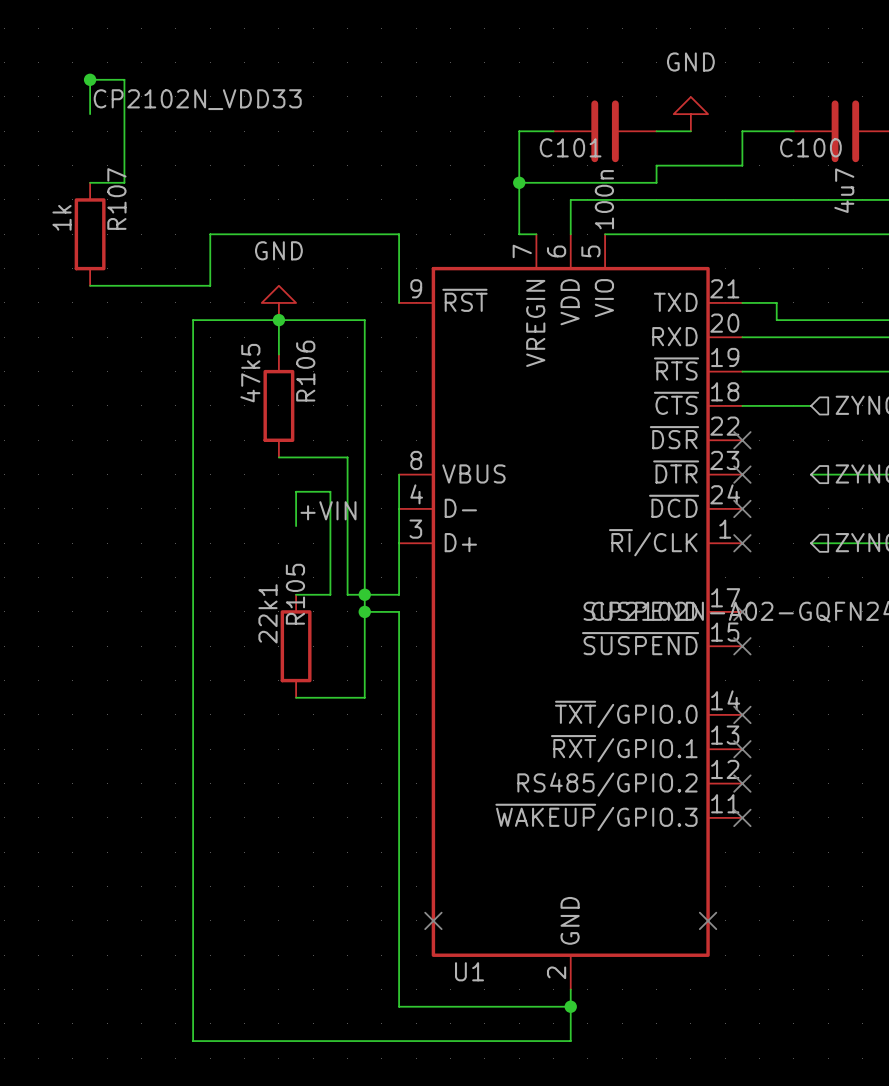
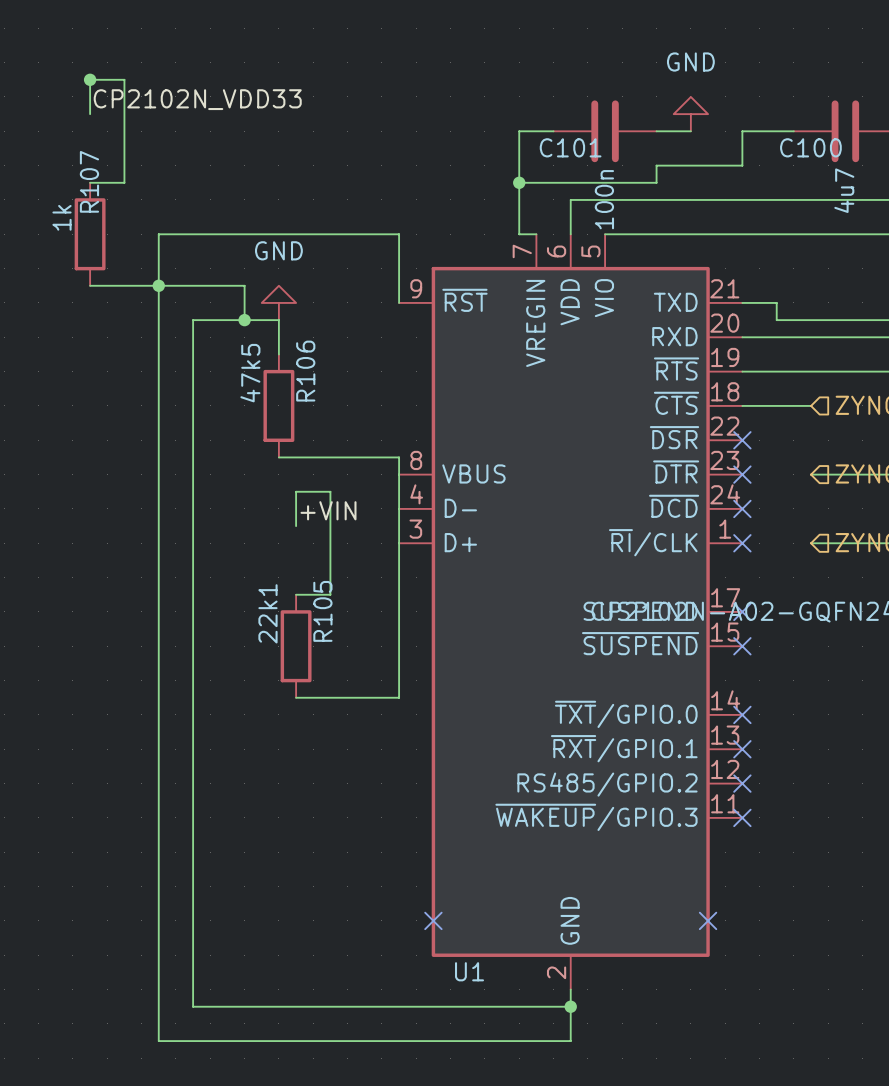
R107 name position: R107 (116, 199) -> R107 (89, 181)
wire: (210, 234) (210, 285) -> (244, 320) (244, 285) (210, 285)
wire: none -> (210, 234) (158, 234) (158, 1041) (193, 1041)
junction: none -> (158, 285)
wire: (278, 320) (364, 320) (364, 697) -> none
junction position: (278, 320) -> (244, 320)
wire: (347, 457) (347, 594) (399, 594) -> (347, 457) (399, 457) (399, 474)
R105 name position: R105 (295, 594) -> R105 (322, 611)
junction: (364, 594) -> none
wire: (364, 611) (399, 611) -> (399, 594) (399, 611)
junction: (364, 611) -> none
wire: (399, 697) (399, 1006) -> (399, 697) (364, 697)
wire: (193, 1006) (193, 1041) -> (193, 1006) (399, 1006)

